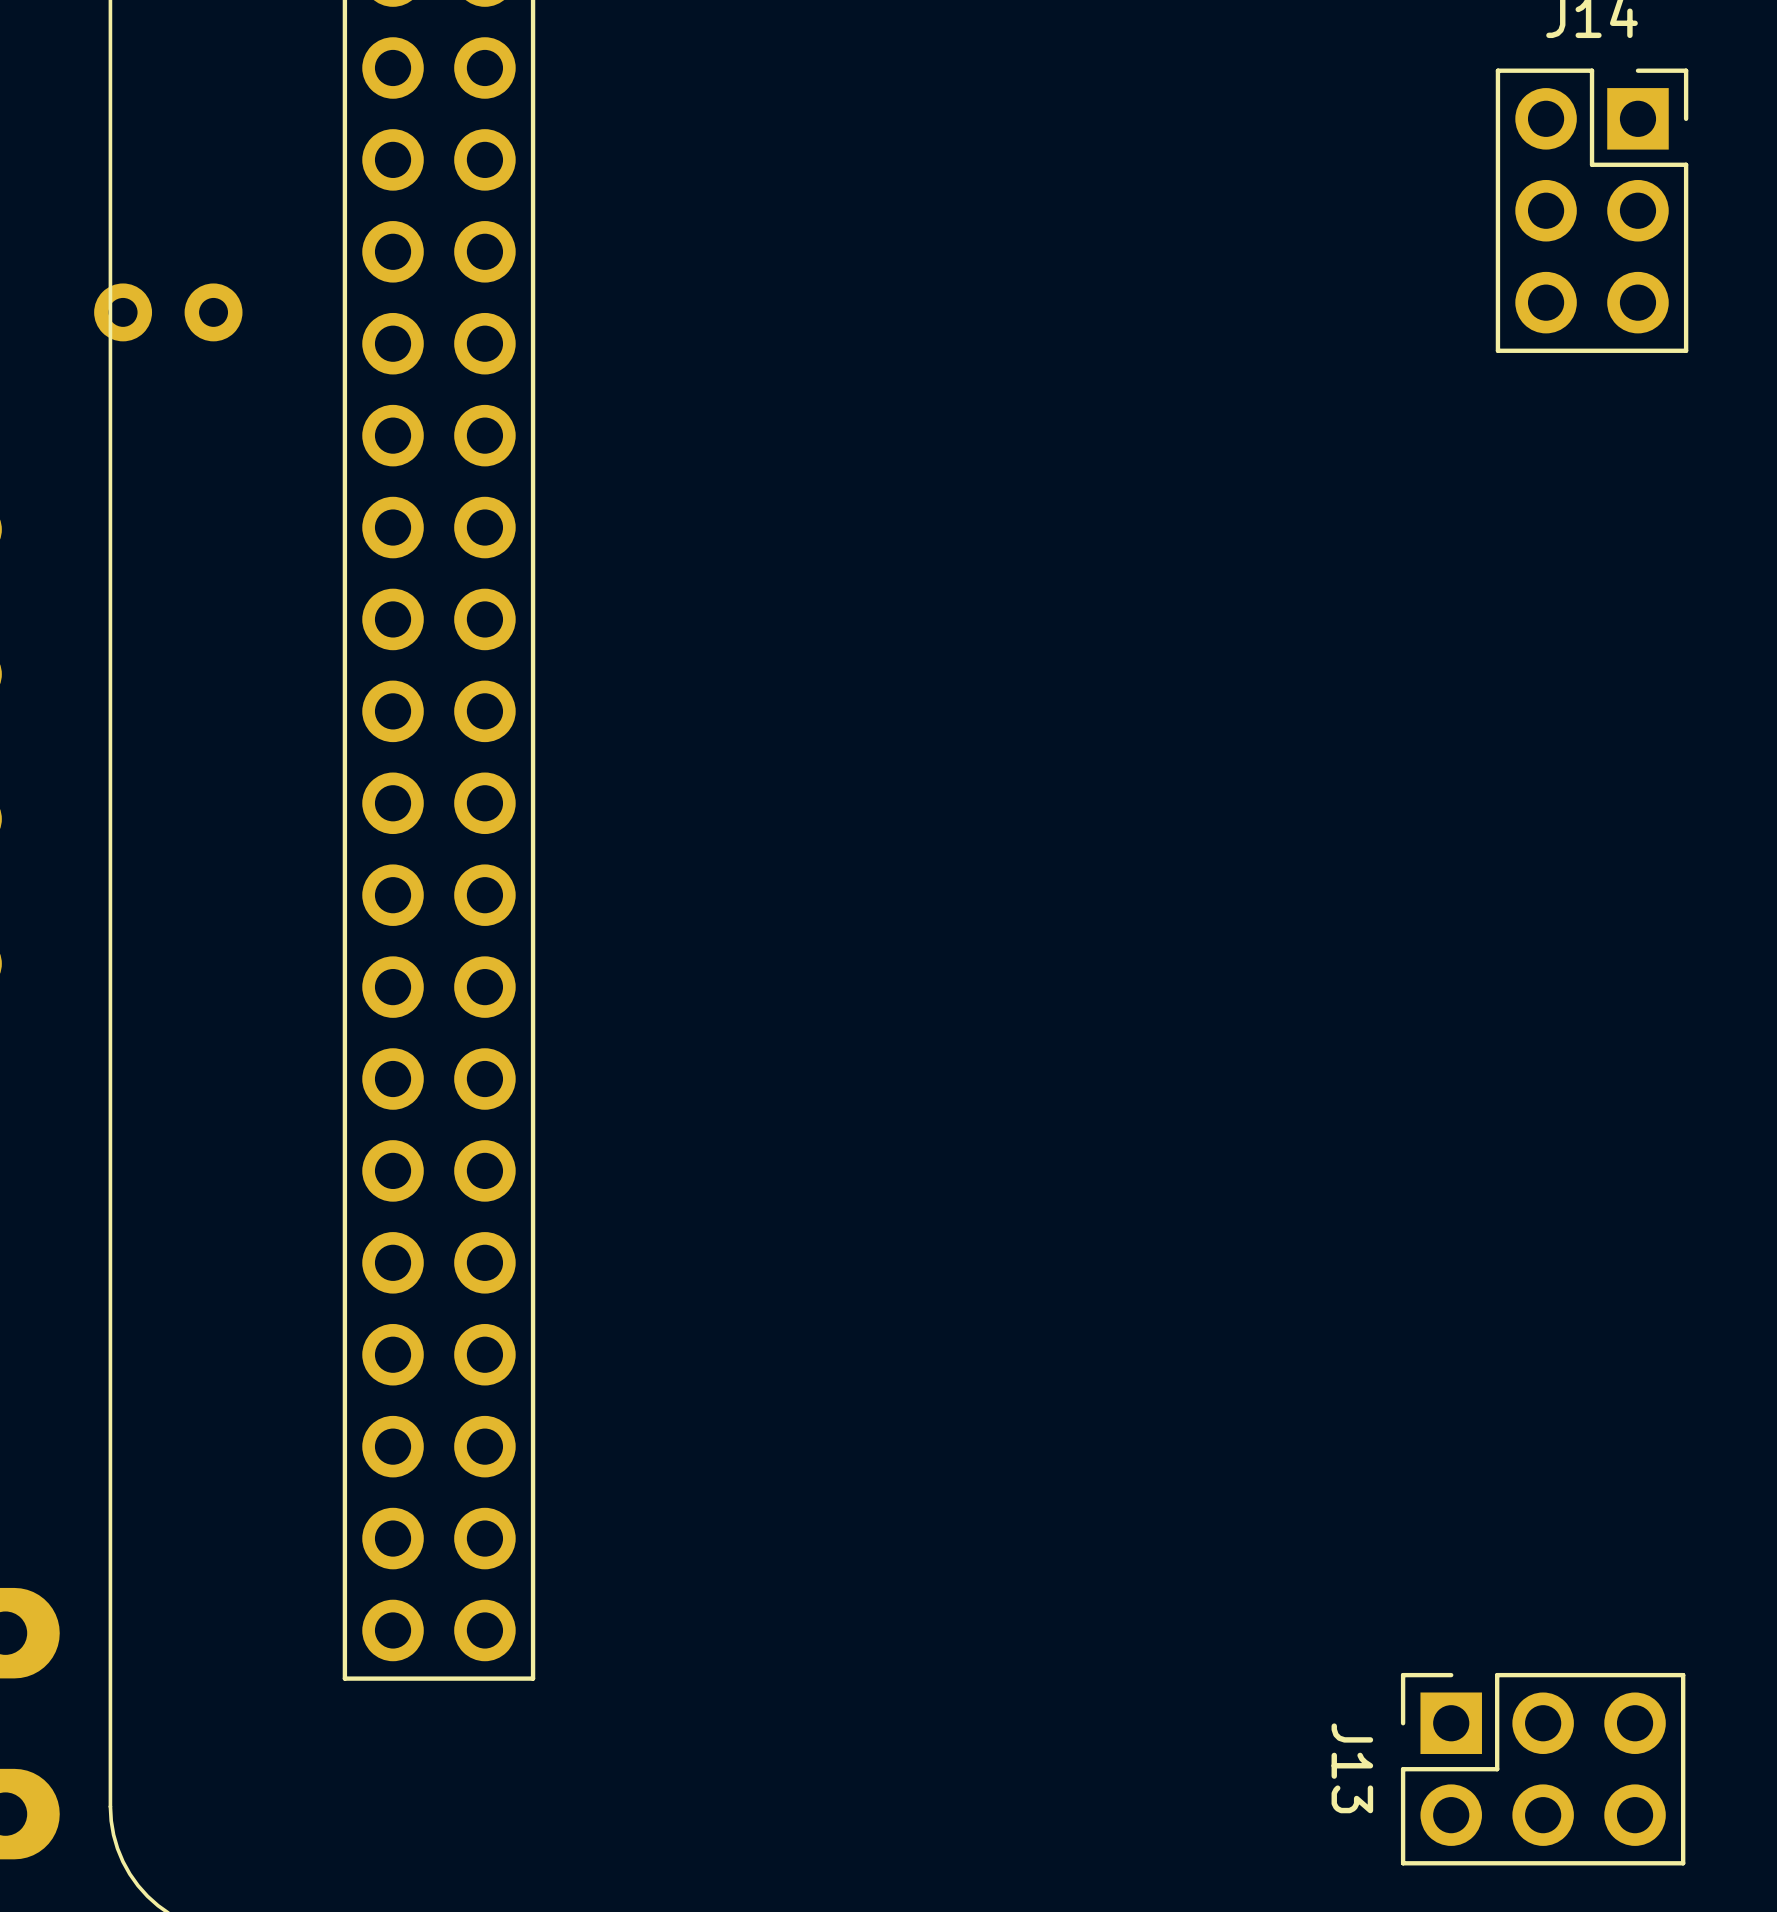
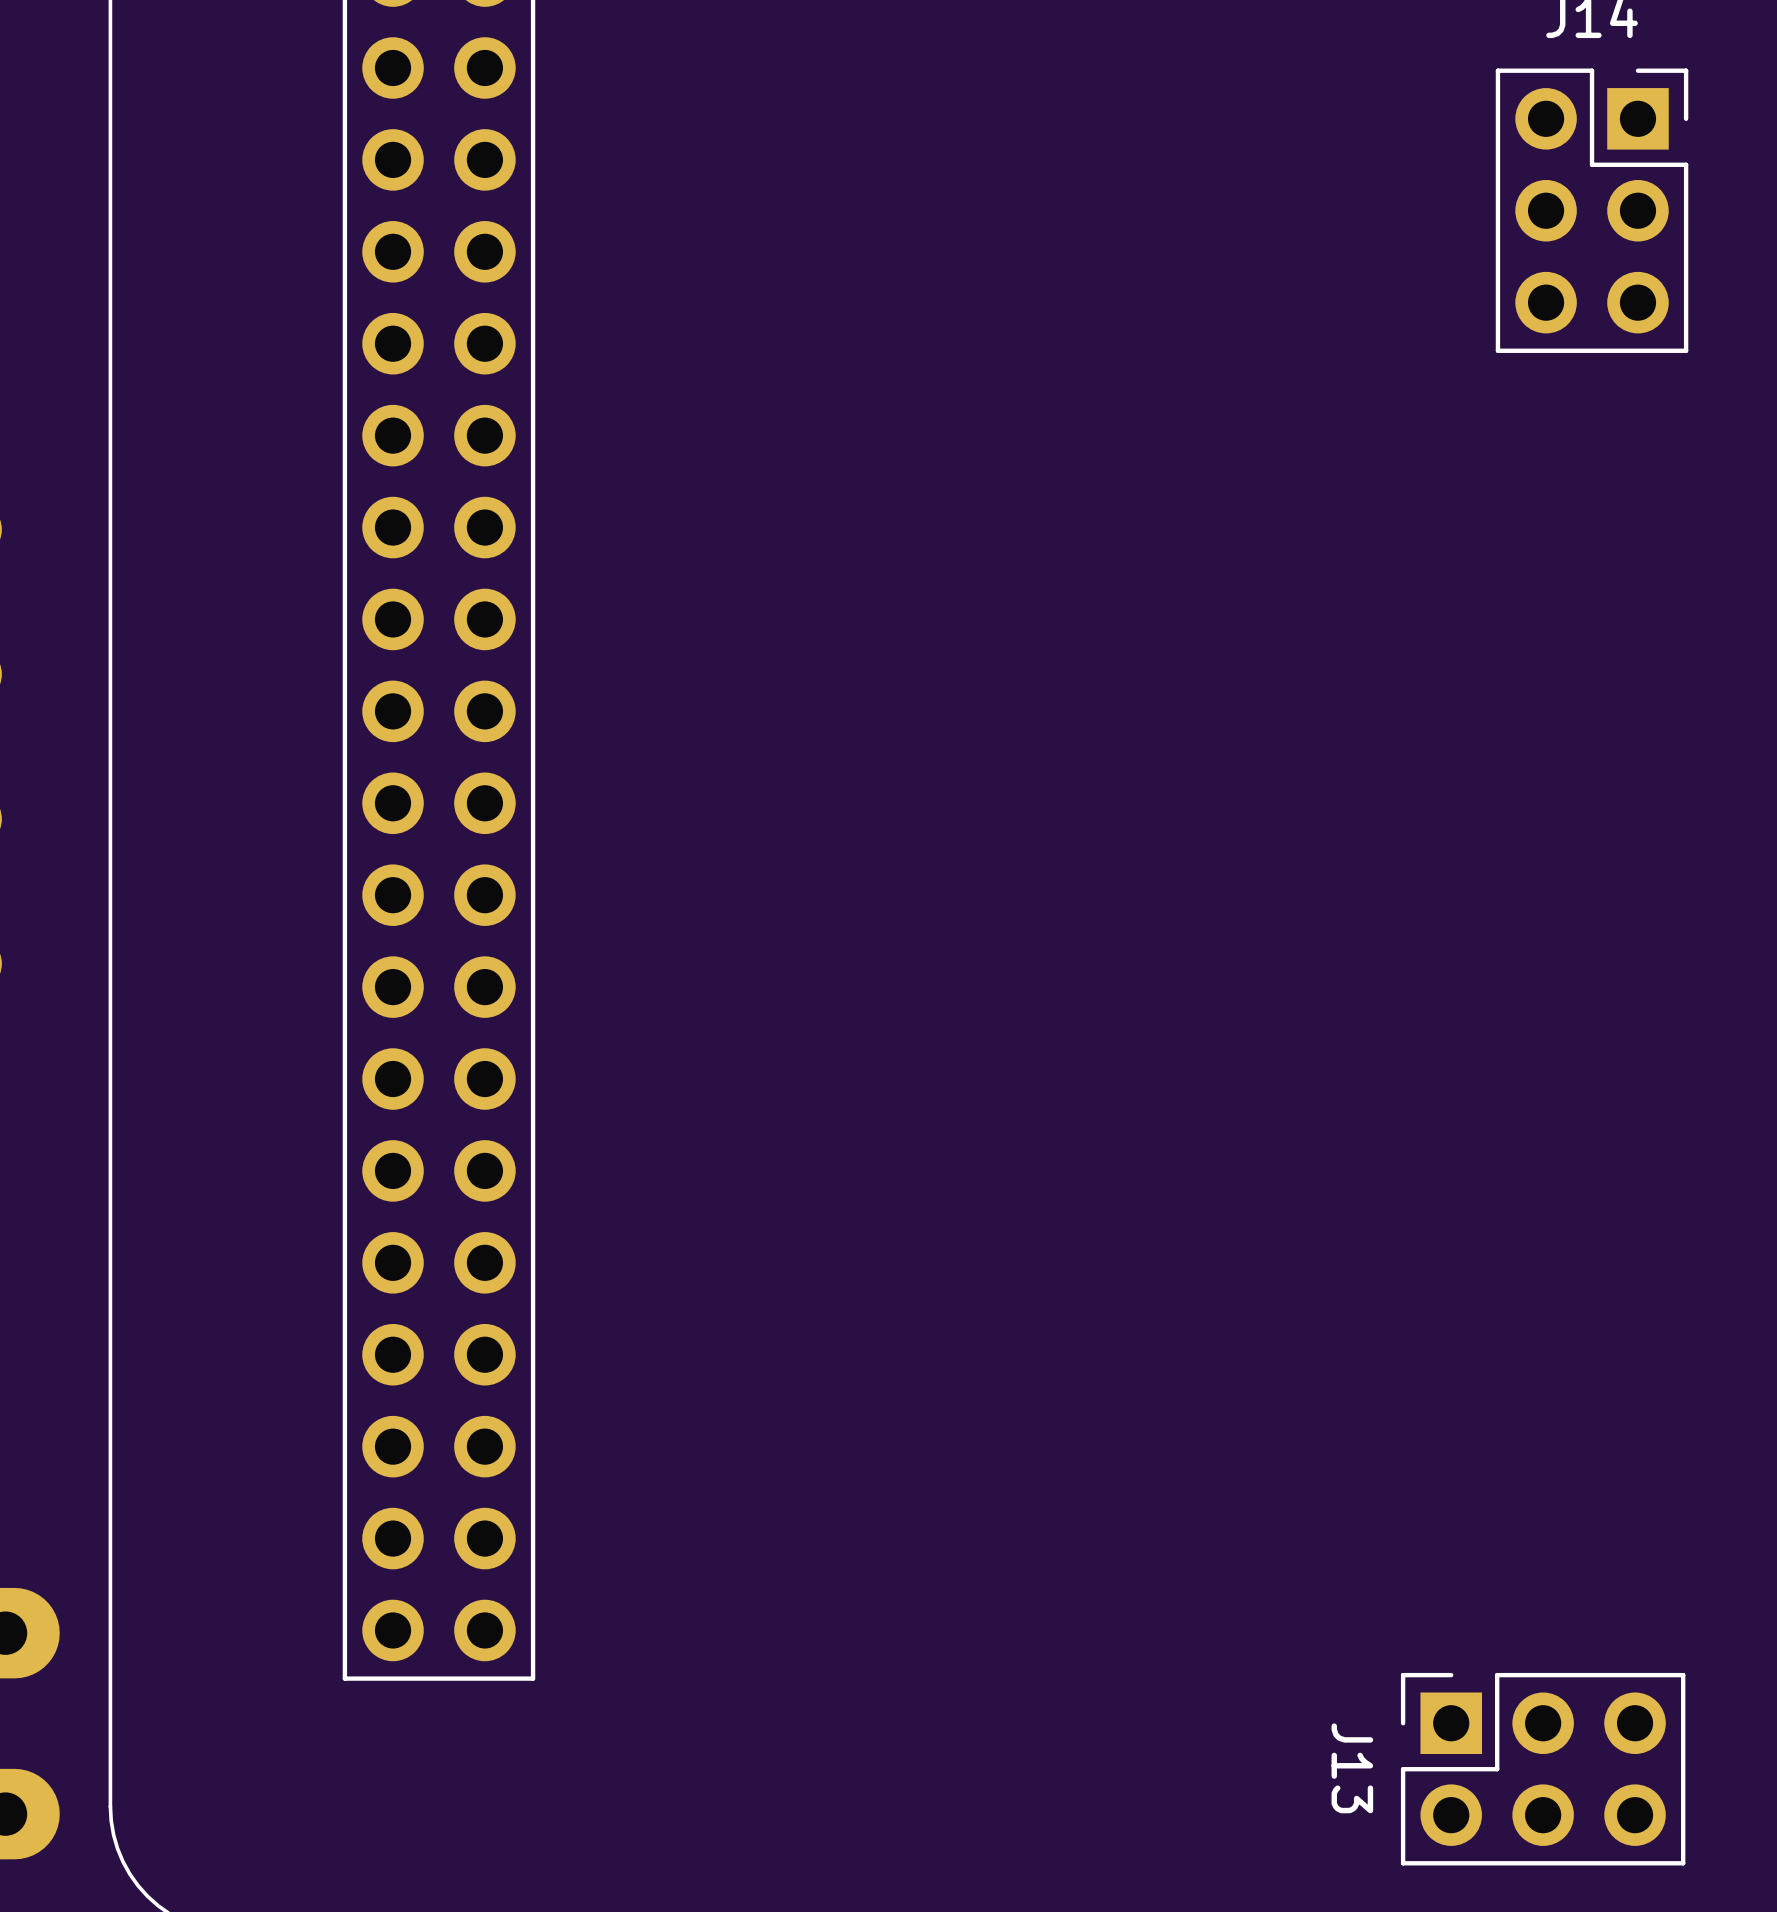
part: (168, 312) -> none

